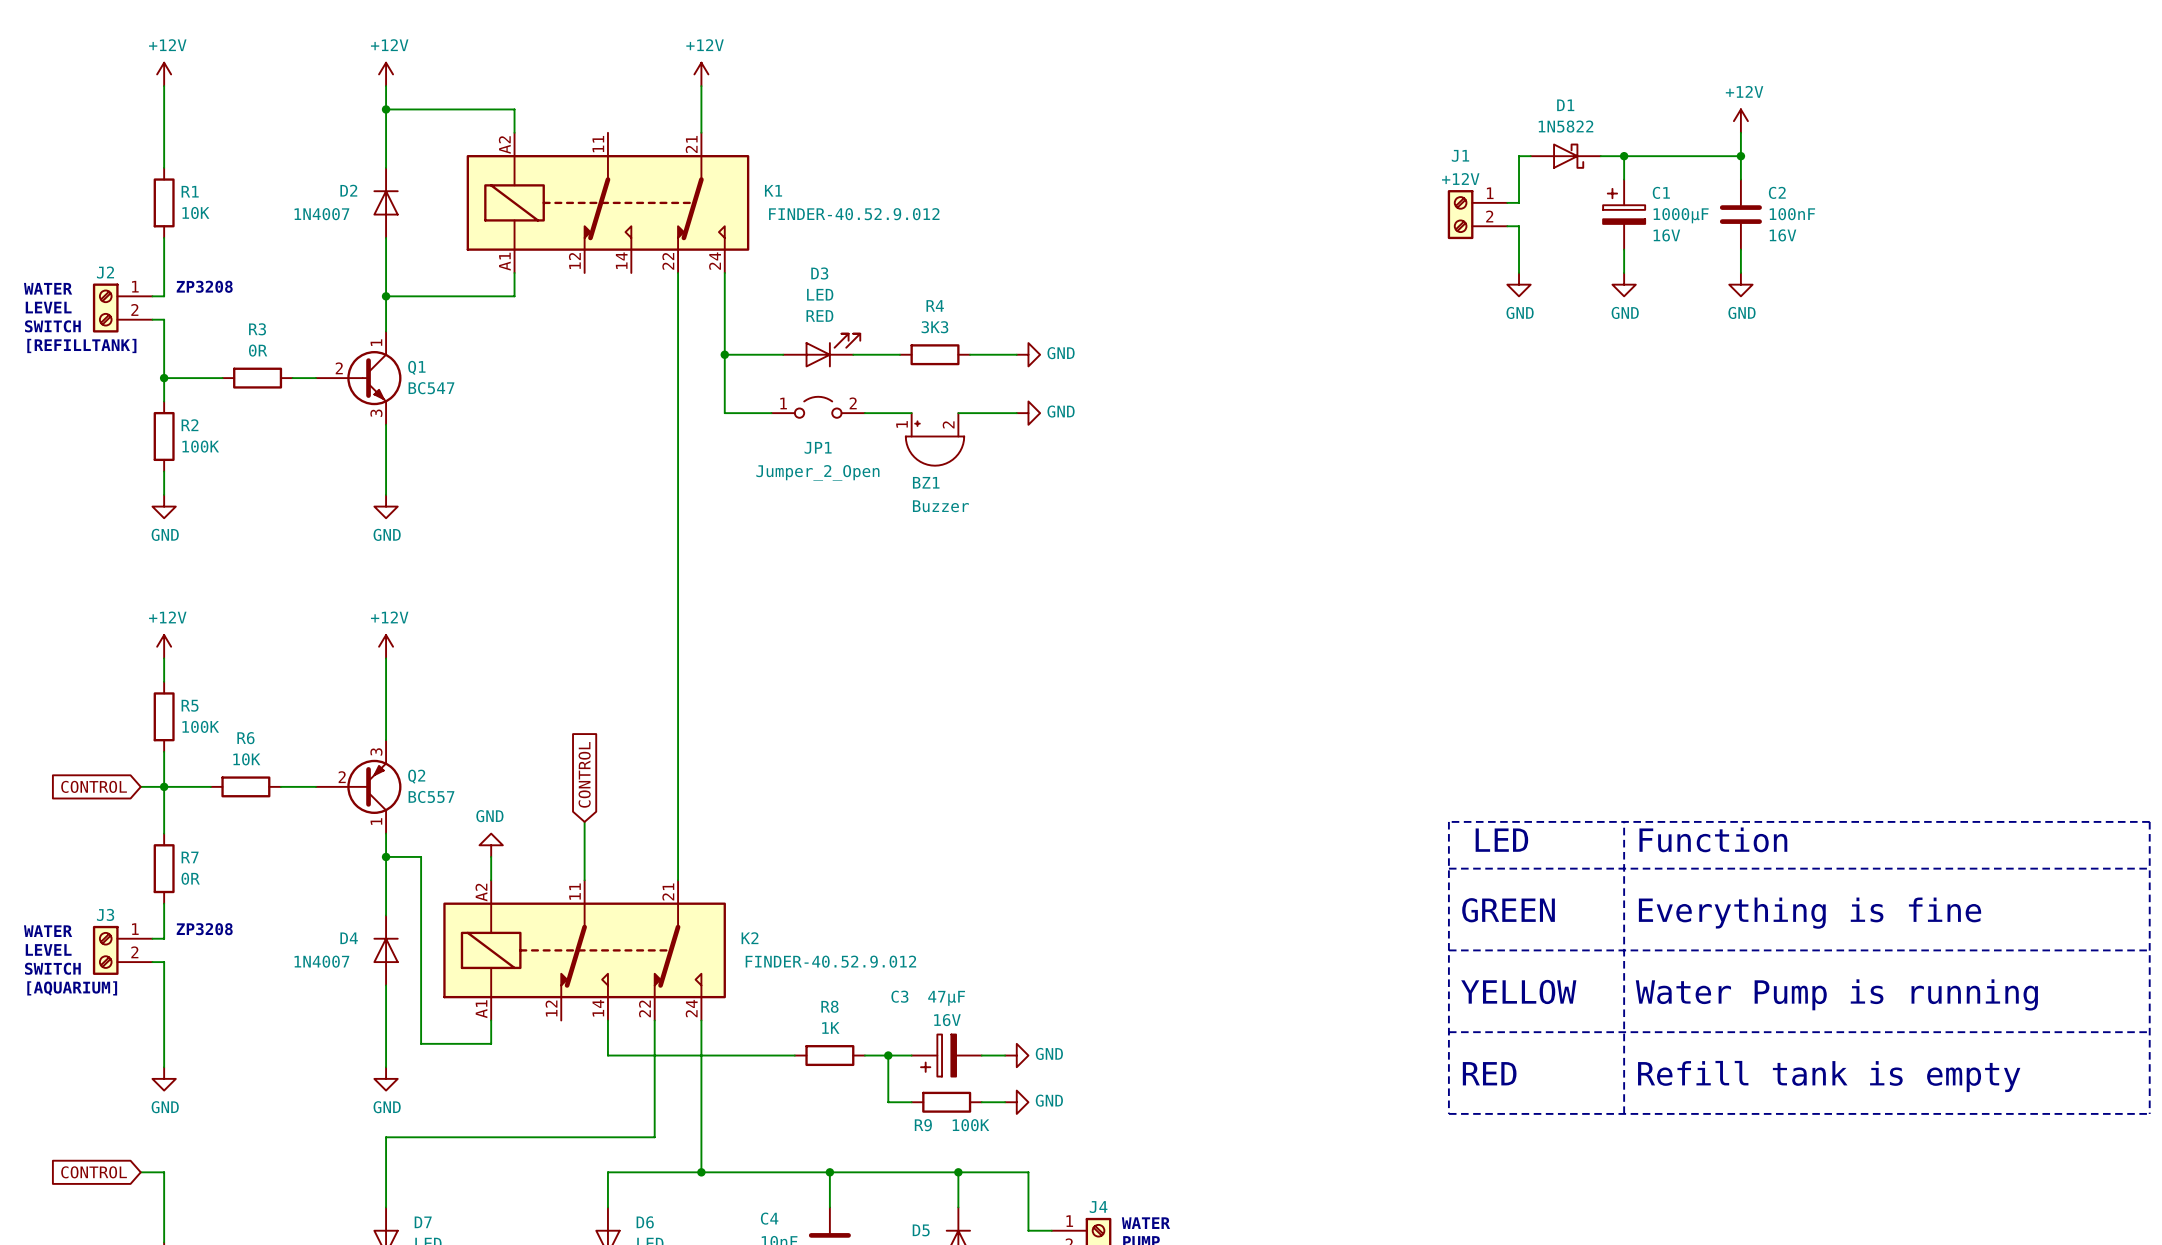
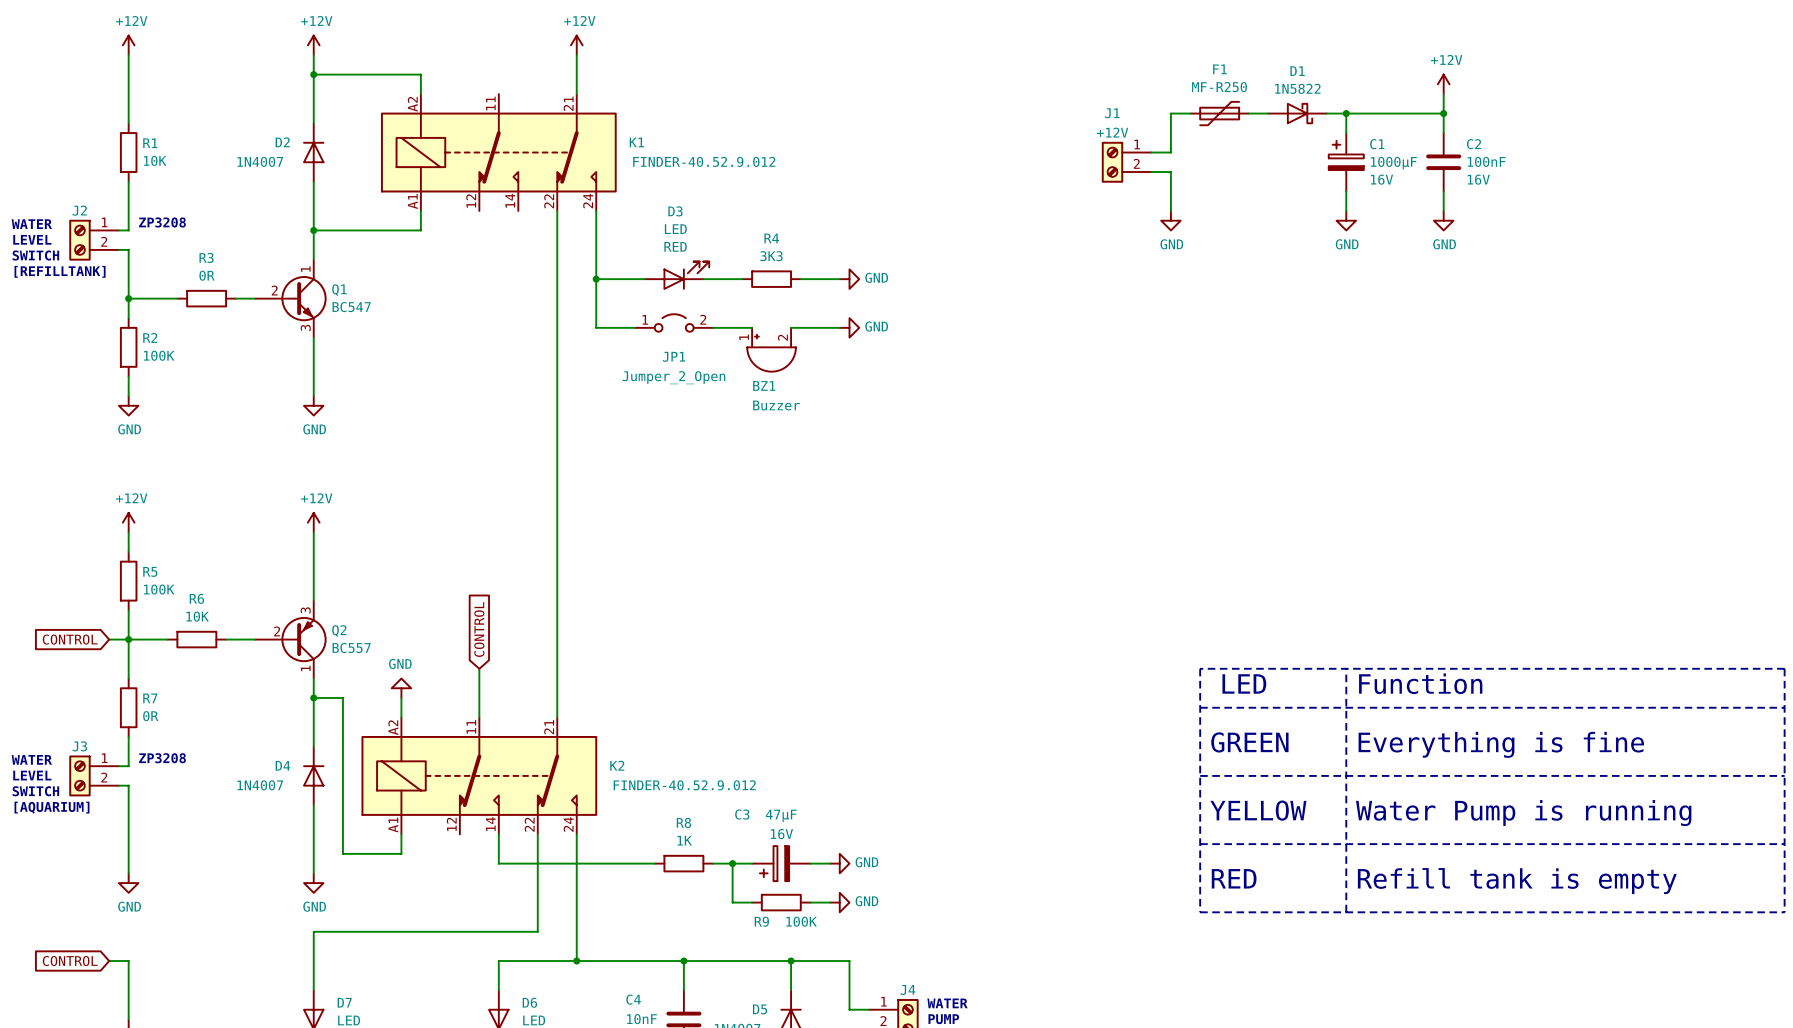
wire: none -> (1190, 113) (1170, 113) (1170, 152) (1151, 152)
F1: none -> MF-R250 (1219, 113)
wire: (1519, 156) (1519, 202) (1507, 202) -> (1258, 113) (1248, 113)
J1 position: (1477, 214) -> (1126, 162)
wire: none -> (1151, 172) (1170, 172) (1170, 210)
wire: (1507, 226) (1519, 226) (1519, 272) -> none
power symbol position: GND (1519, 284) -> GND (1170, 220)

